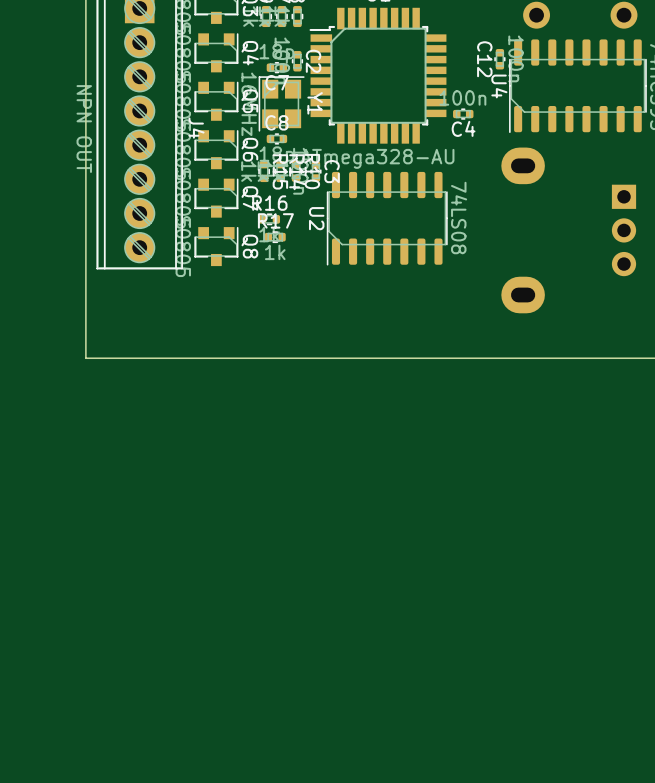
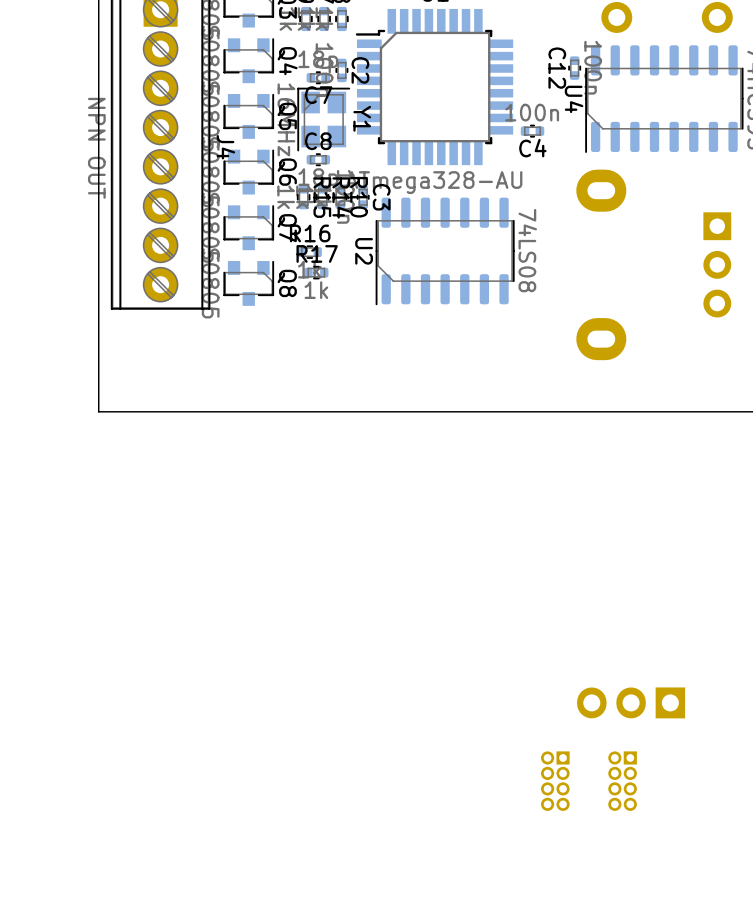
part: none -> (631, 702)
part: none -> (555, 781)
part: none -> (622, 781)

